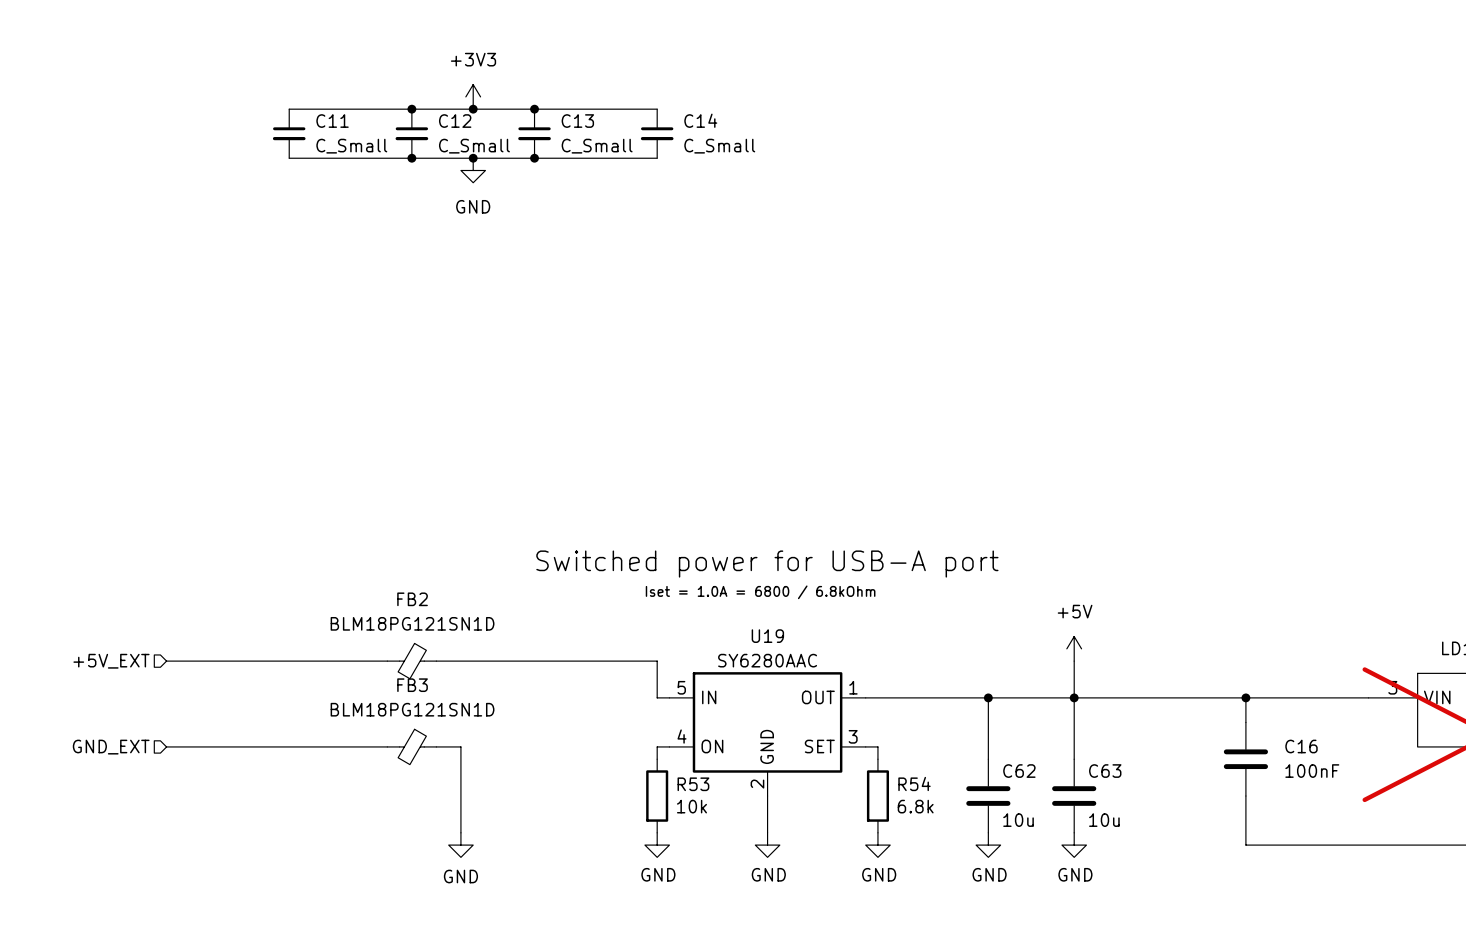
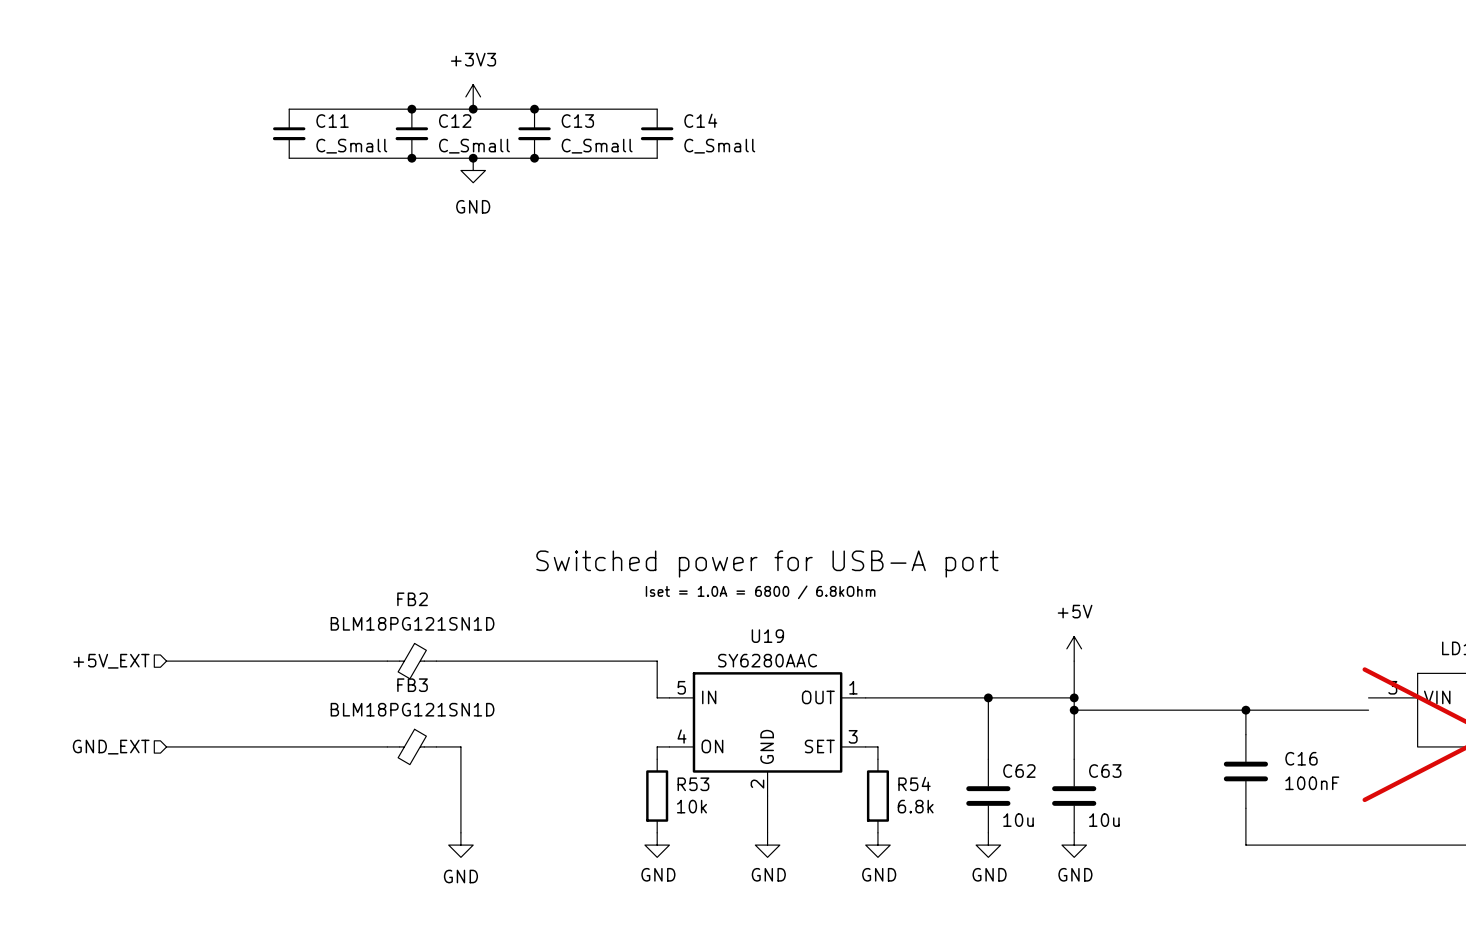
wire: (1074, 697) (1368, 697) -> (1074, 710) (1368, 710)
wire: (1245, 697) (1245, 710) -> none
junction position: (1245, 697) -> (1245, 710)
junction: none -> (1074, 710)
C16 position: (1245, 759) -> (1245, 771)

